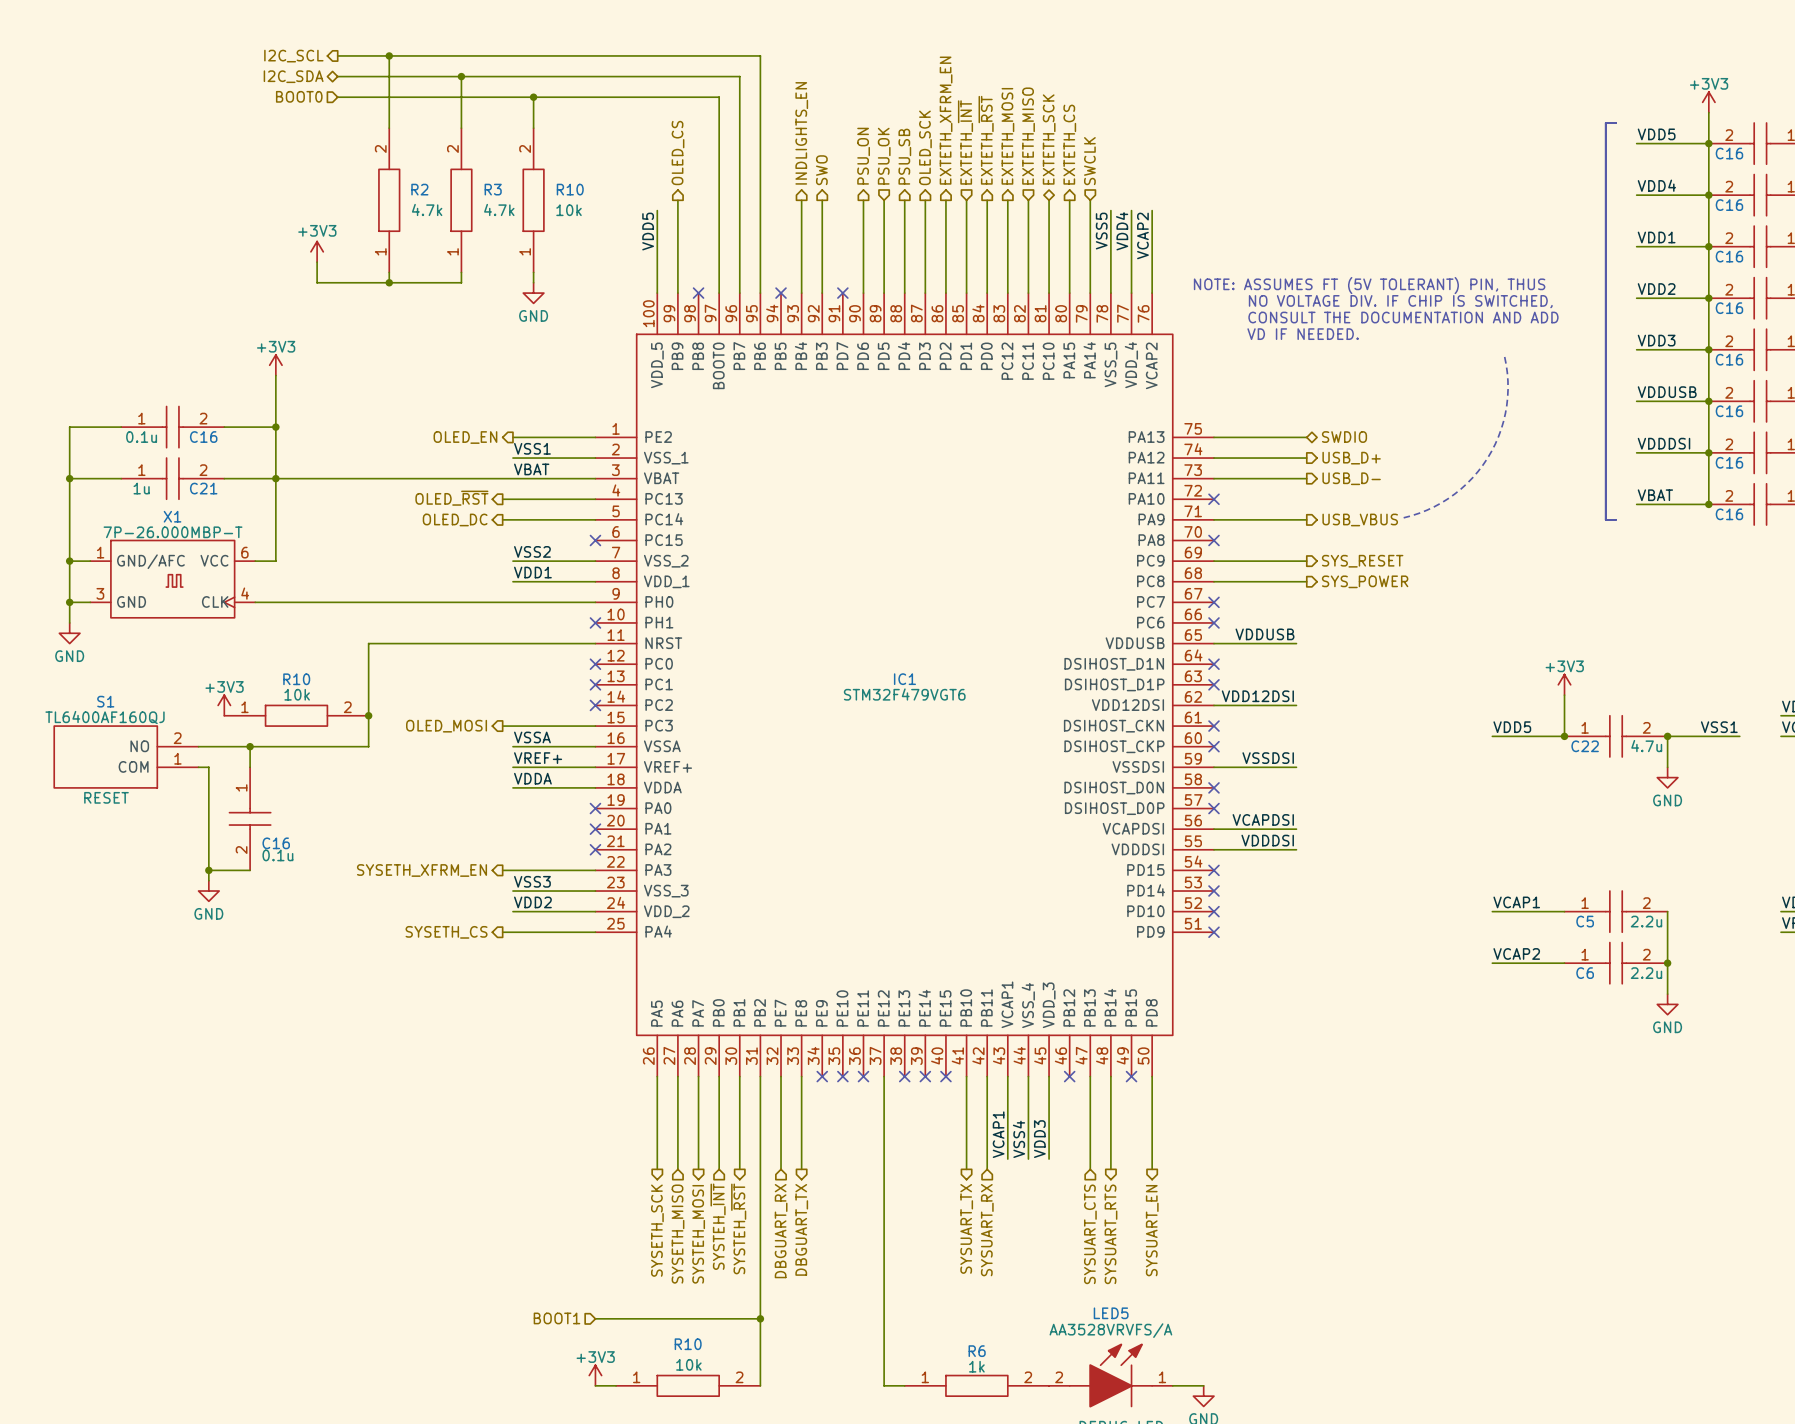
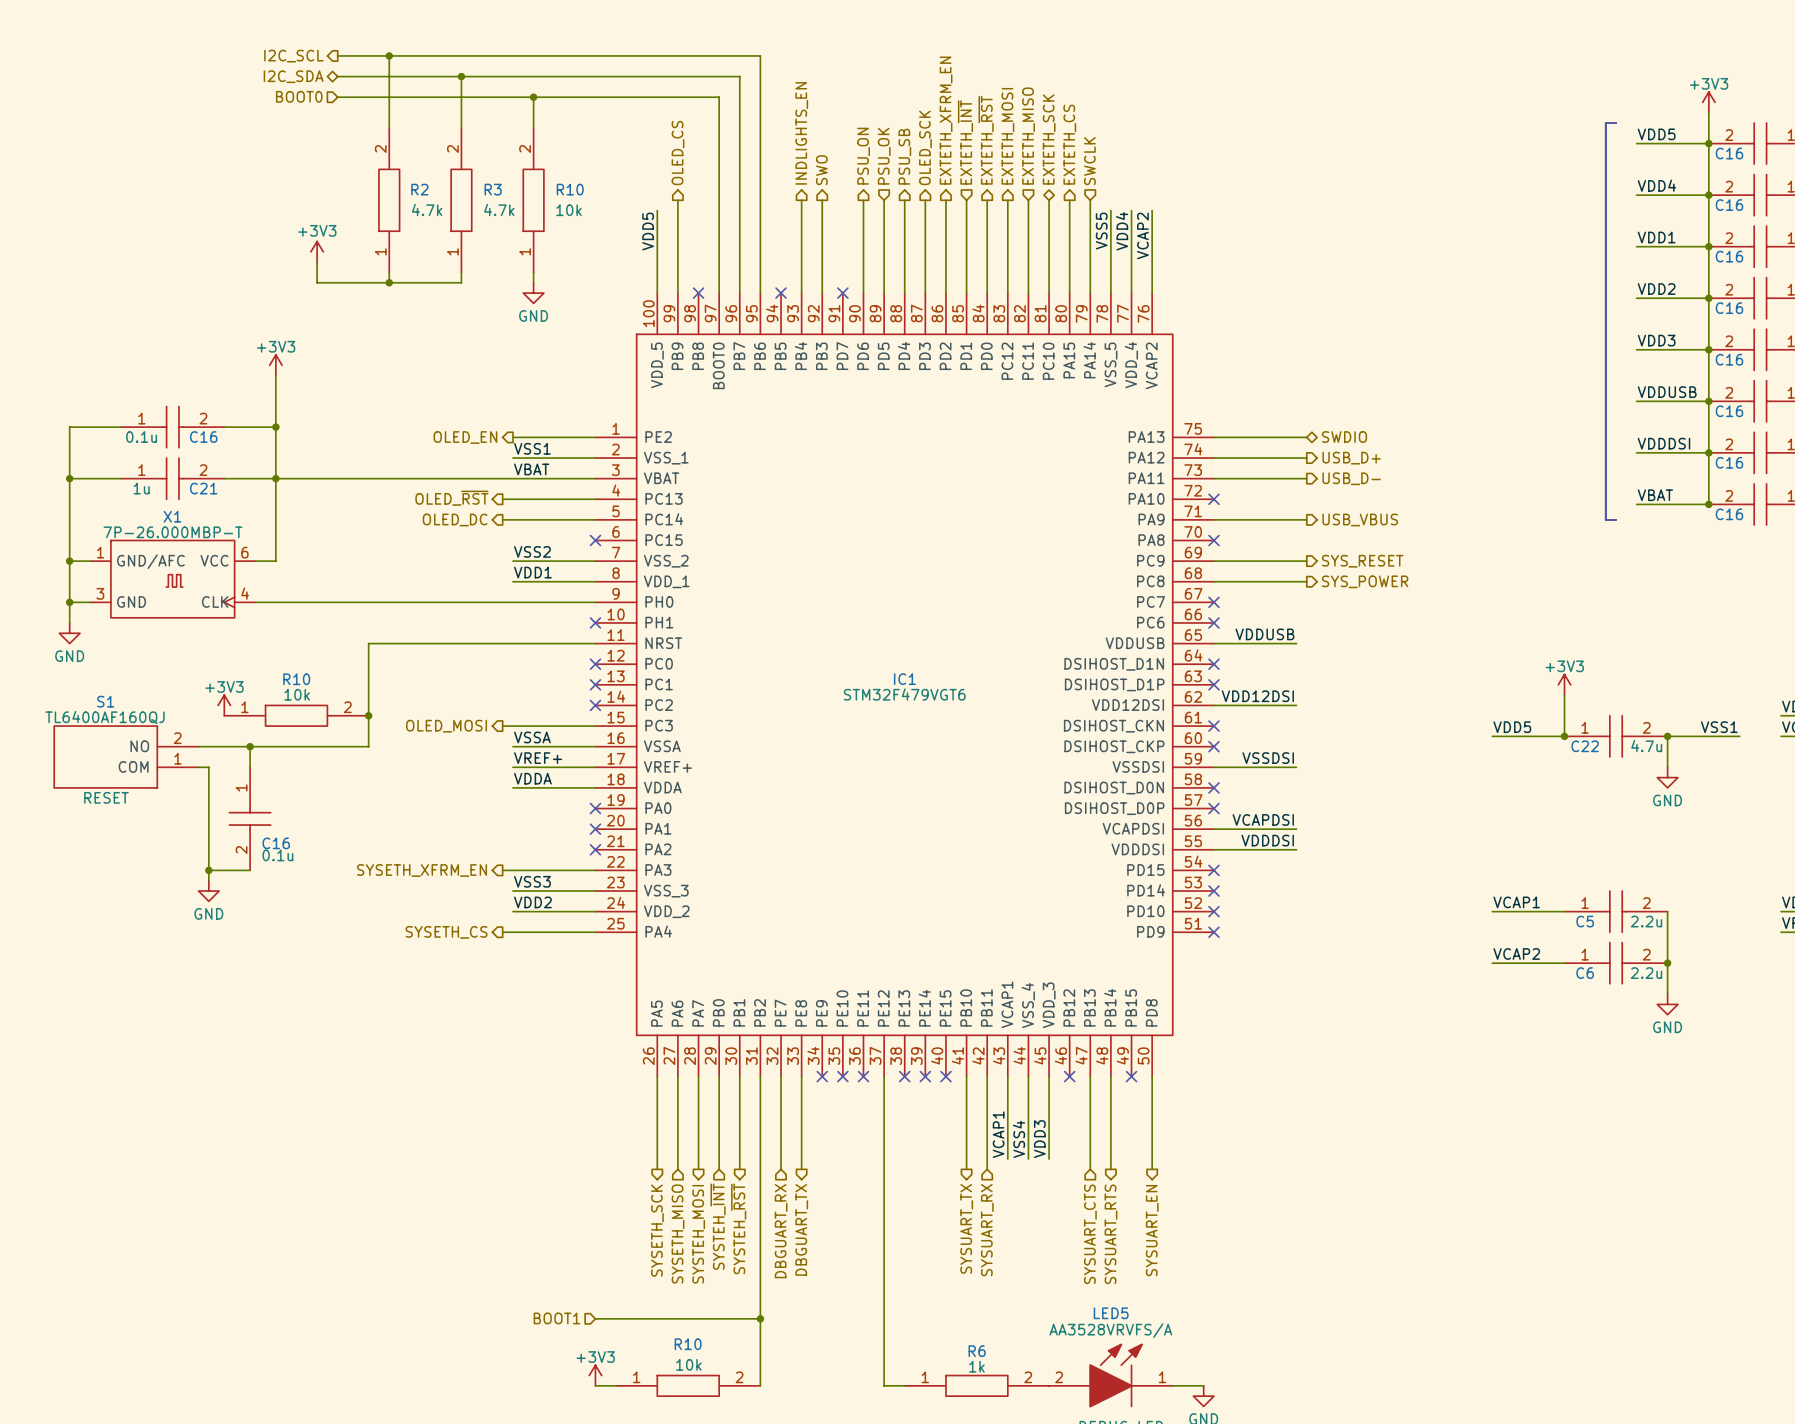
text: NOTE: ASSUMES FT (5V TOLERANT) PIN, THUS (1369, 285) -> none
text: NO VOLTAGE DIV. IF CHIP IS SWITCHED, (1400, 301) -> none
text: CONSULT THE DOCUMENTATION AND ADD (1403, 317) -> none
text: VD IF NEEDED. (1303, 334) -> none
line: (1504, 356) (1507, 381) (1506, 405) (1501, 429) (1487, 458) (1467, 483) (1448, 498) (1426, 510) (1403, 517) -> none

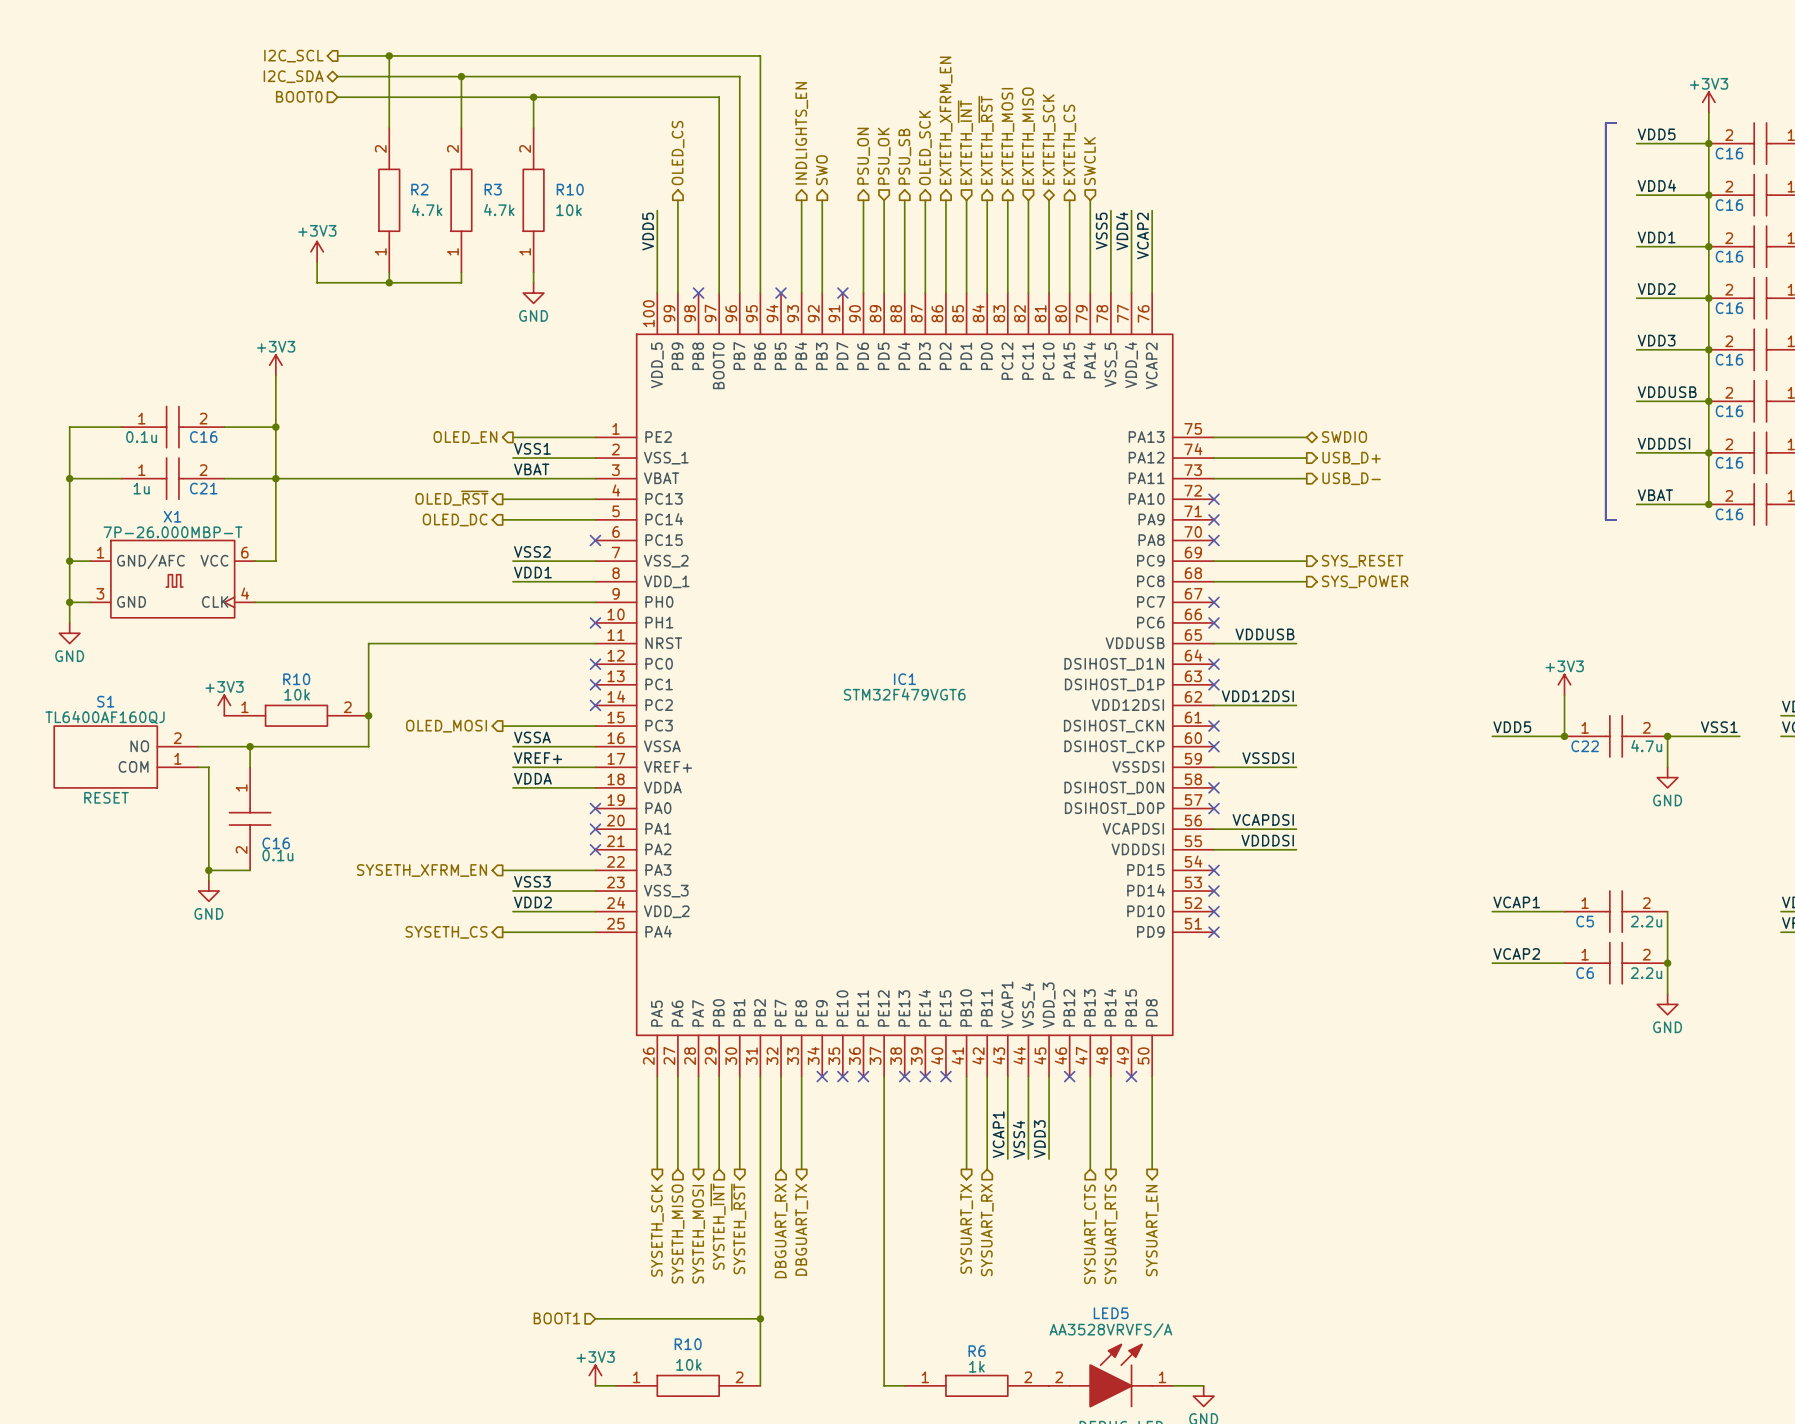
wire: (1213, 519) (1306, 519) -> none
no-connect mark: none -> (1213, 519)
hierarchical label: USB_VBUS (1360, 519) -> none

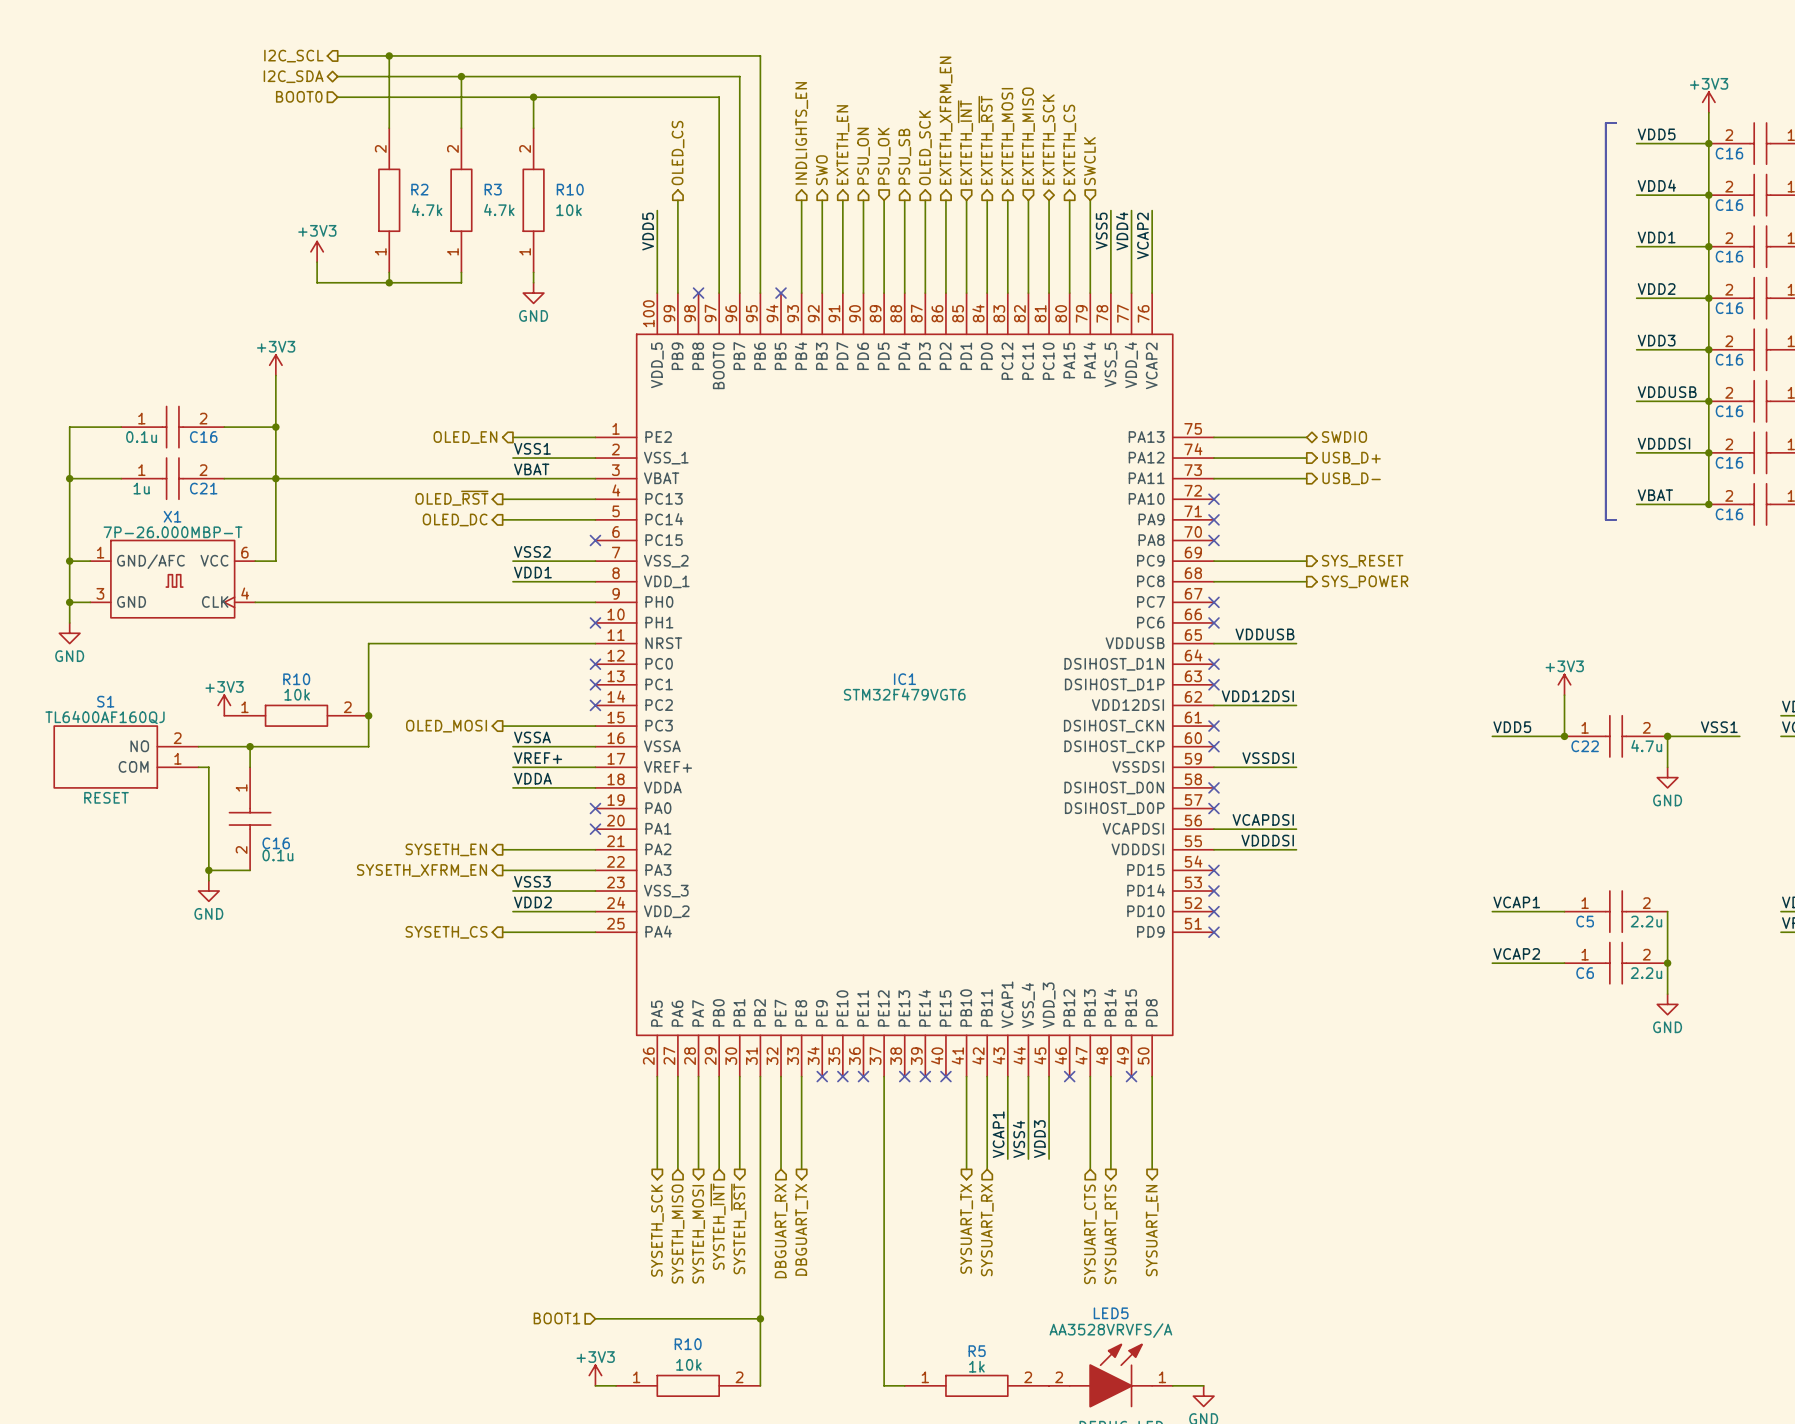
hierarchical label: none -> EXTETH_EN (842, 144)
wire: none -> (842, 200) (842, 293)
no-connect mark: (842, 293) -> none
hierarchical label: none -> SYSETH_EN (446, 849)
wire: none -> (502, 849) (595, 849)
no-connect mark: (595, 849) -> none
R6 name: R6 (977, 1351) -> R5 (977, 1351)

